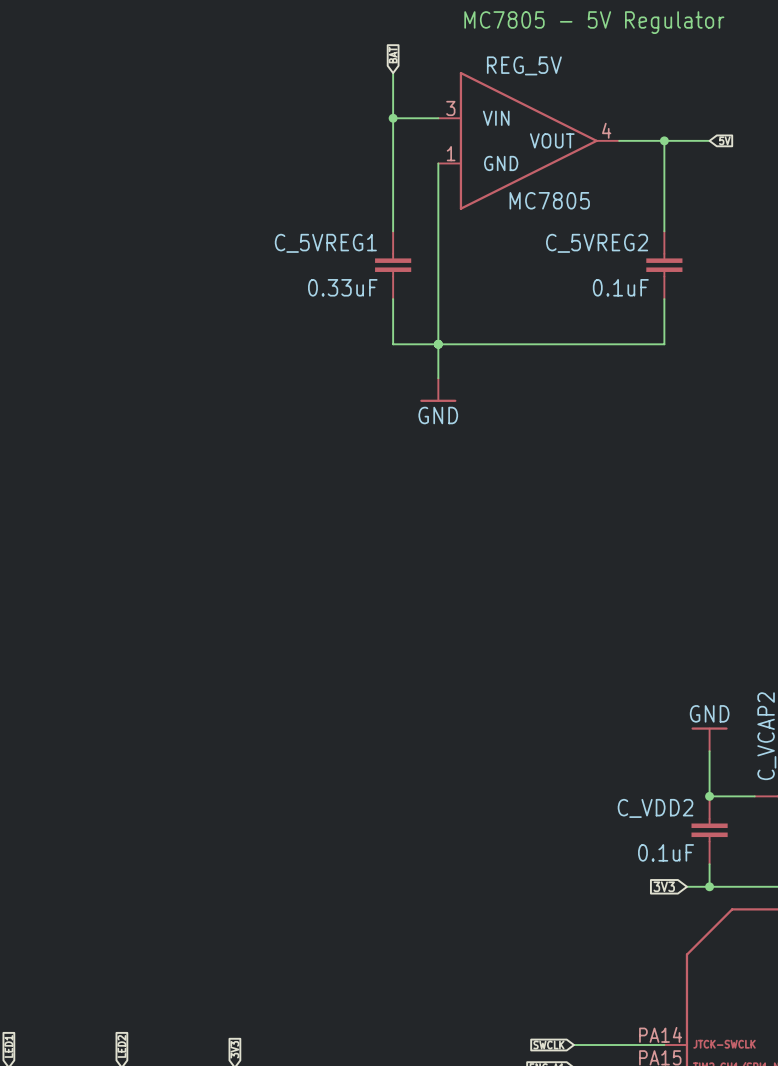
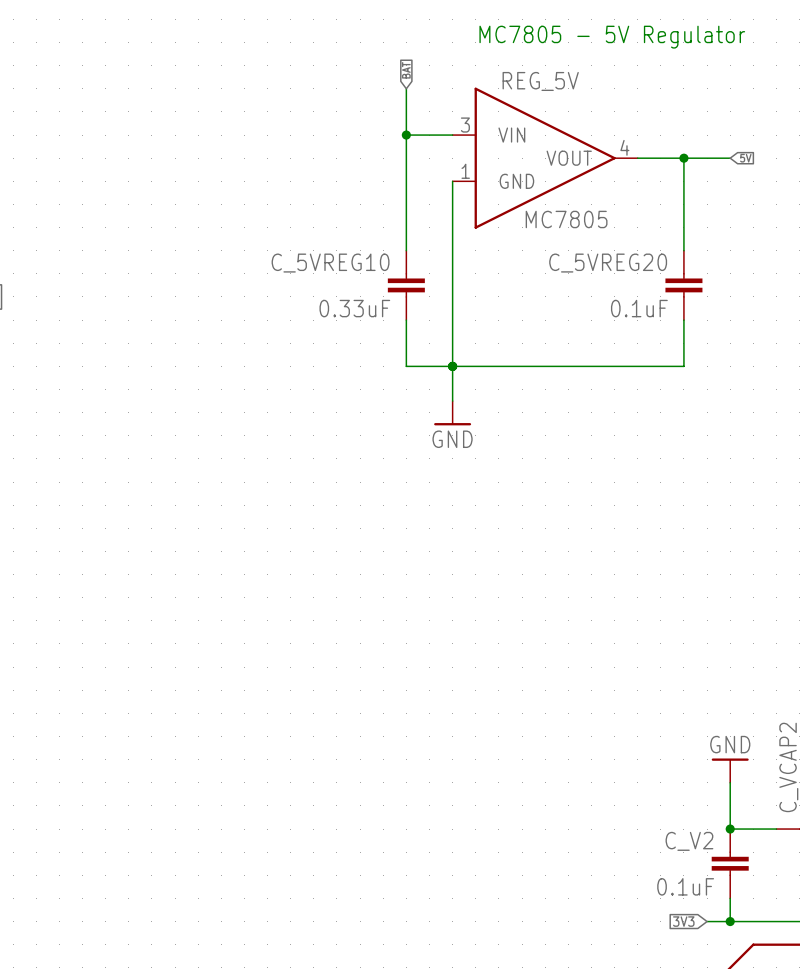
C_5VREG1 name: C_5VREG1 (325, 243) -> C_5VREG10 (330, 263)
C_5VREG2 name: C_5VREG2 (597, 243) -> C_5VREG20 (608, 263)
C_VDD2 name: C_VDD2 (655, 808) -> C_V2 (689, 841)

